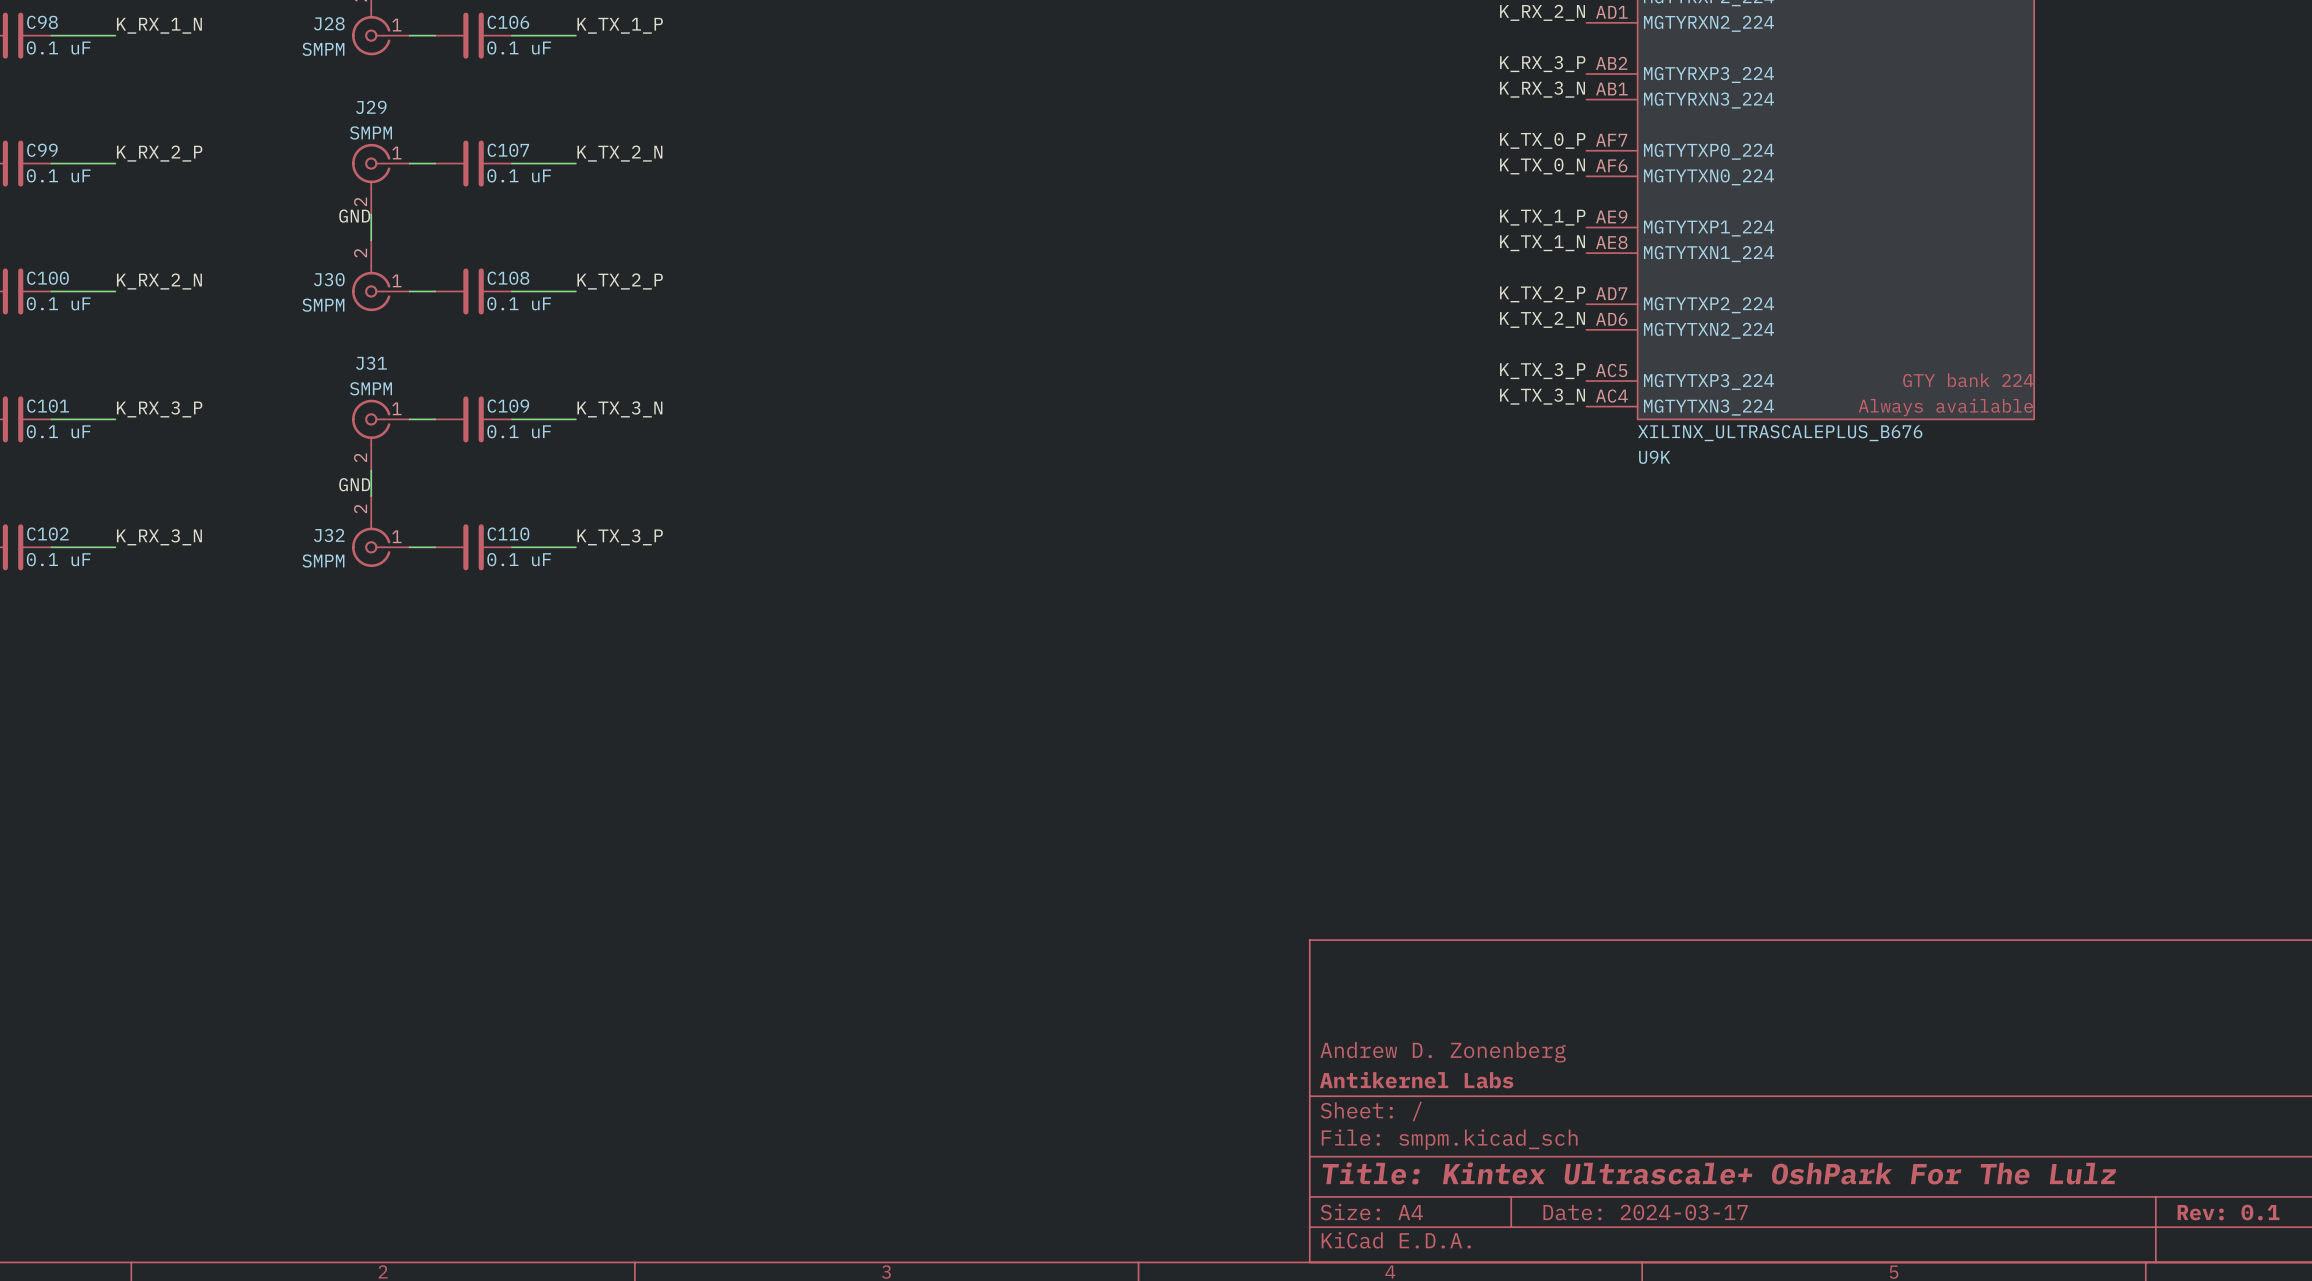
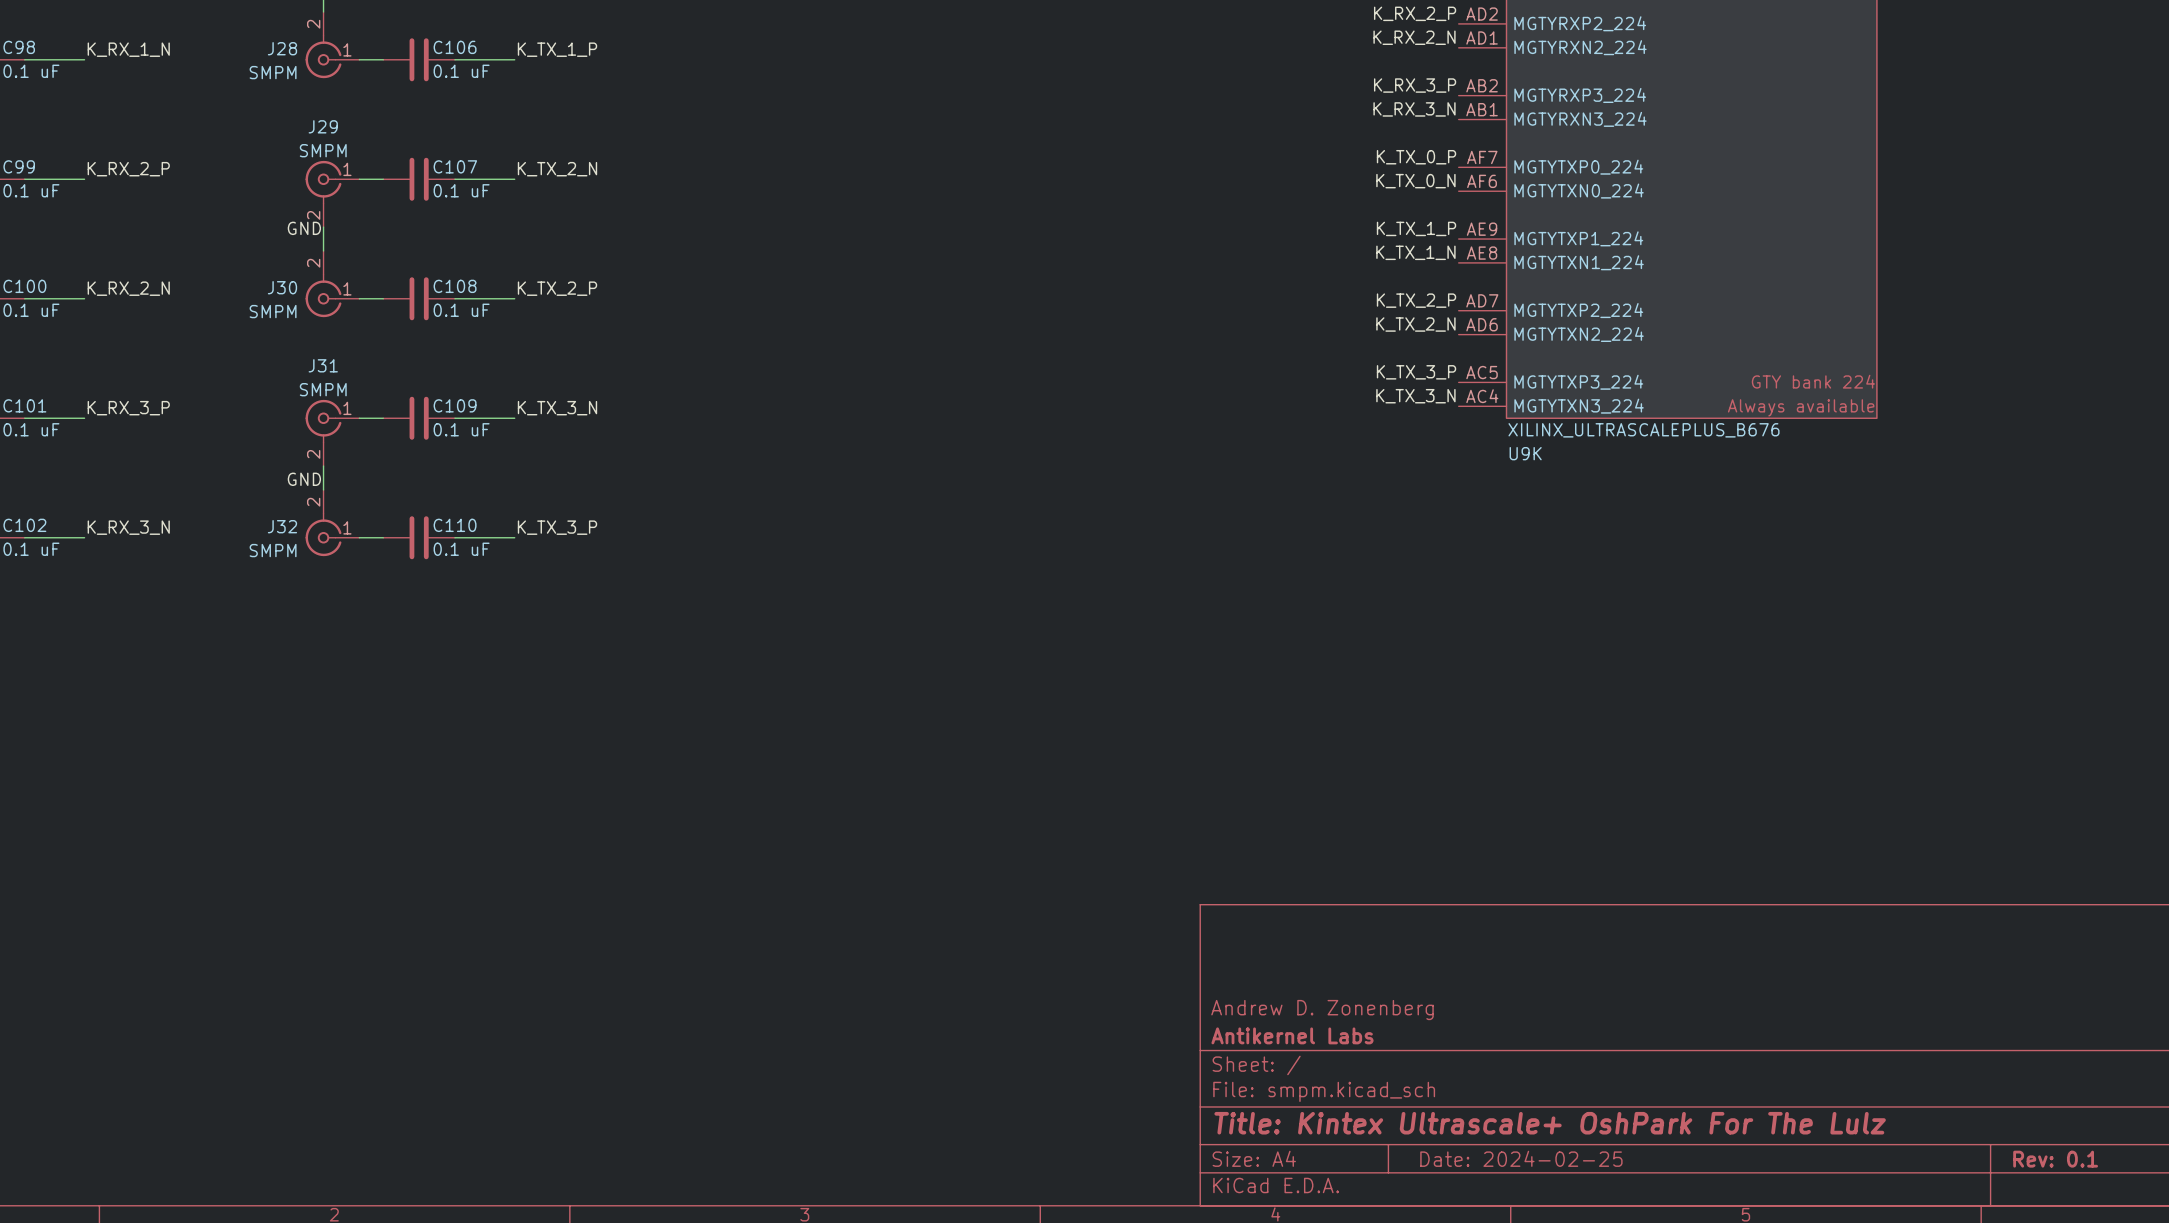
title block: Date: 2024-03-17 (1645, 1212) -> Date: 2024-02-25 (1521, 1158)

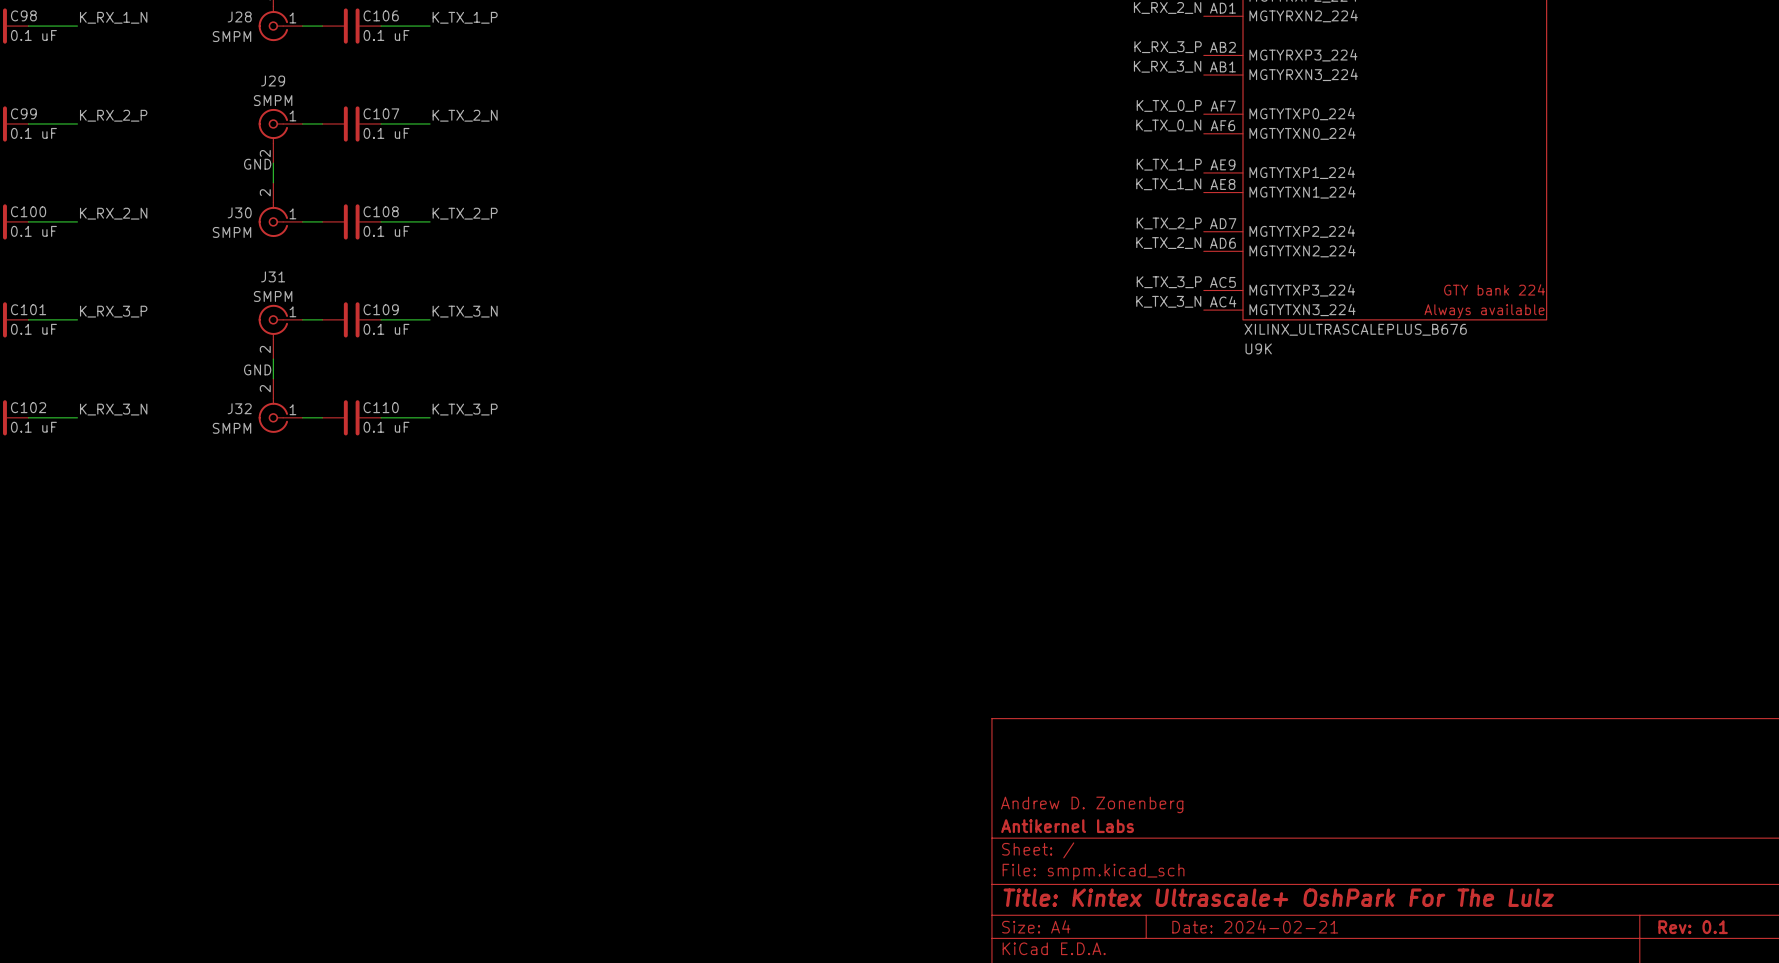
title block: Date: 2024-02-25 (1521, 1158) -> Date: 2024-02-21 (1255, 926)

